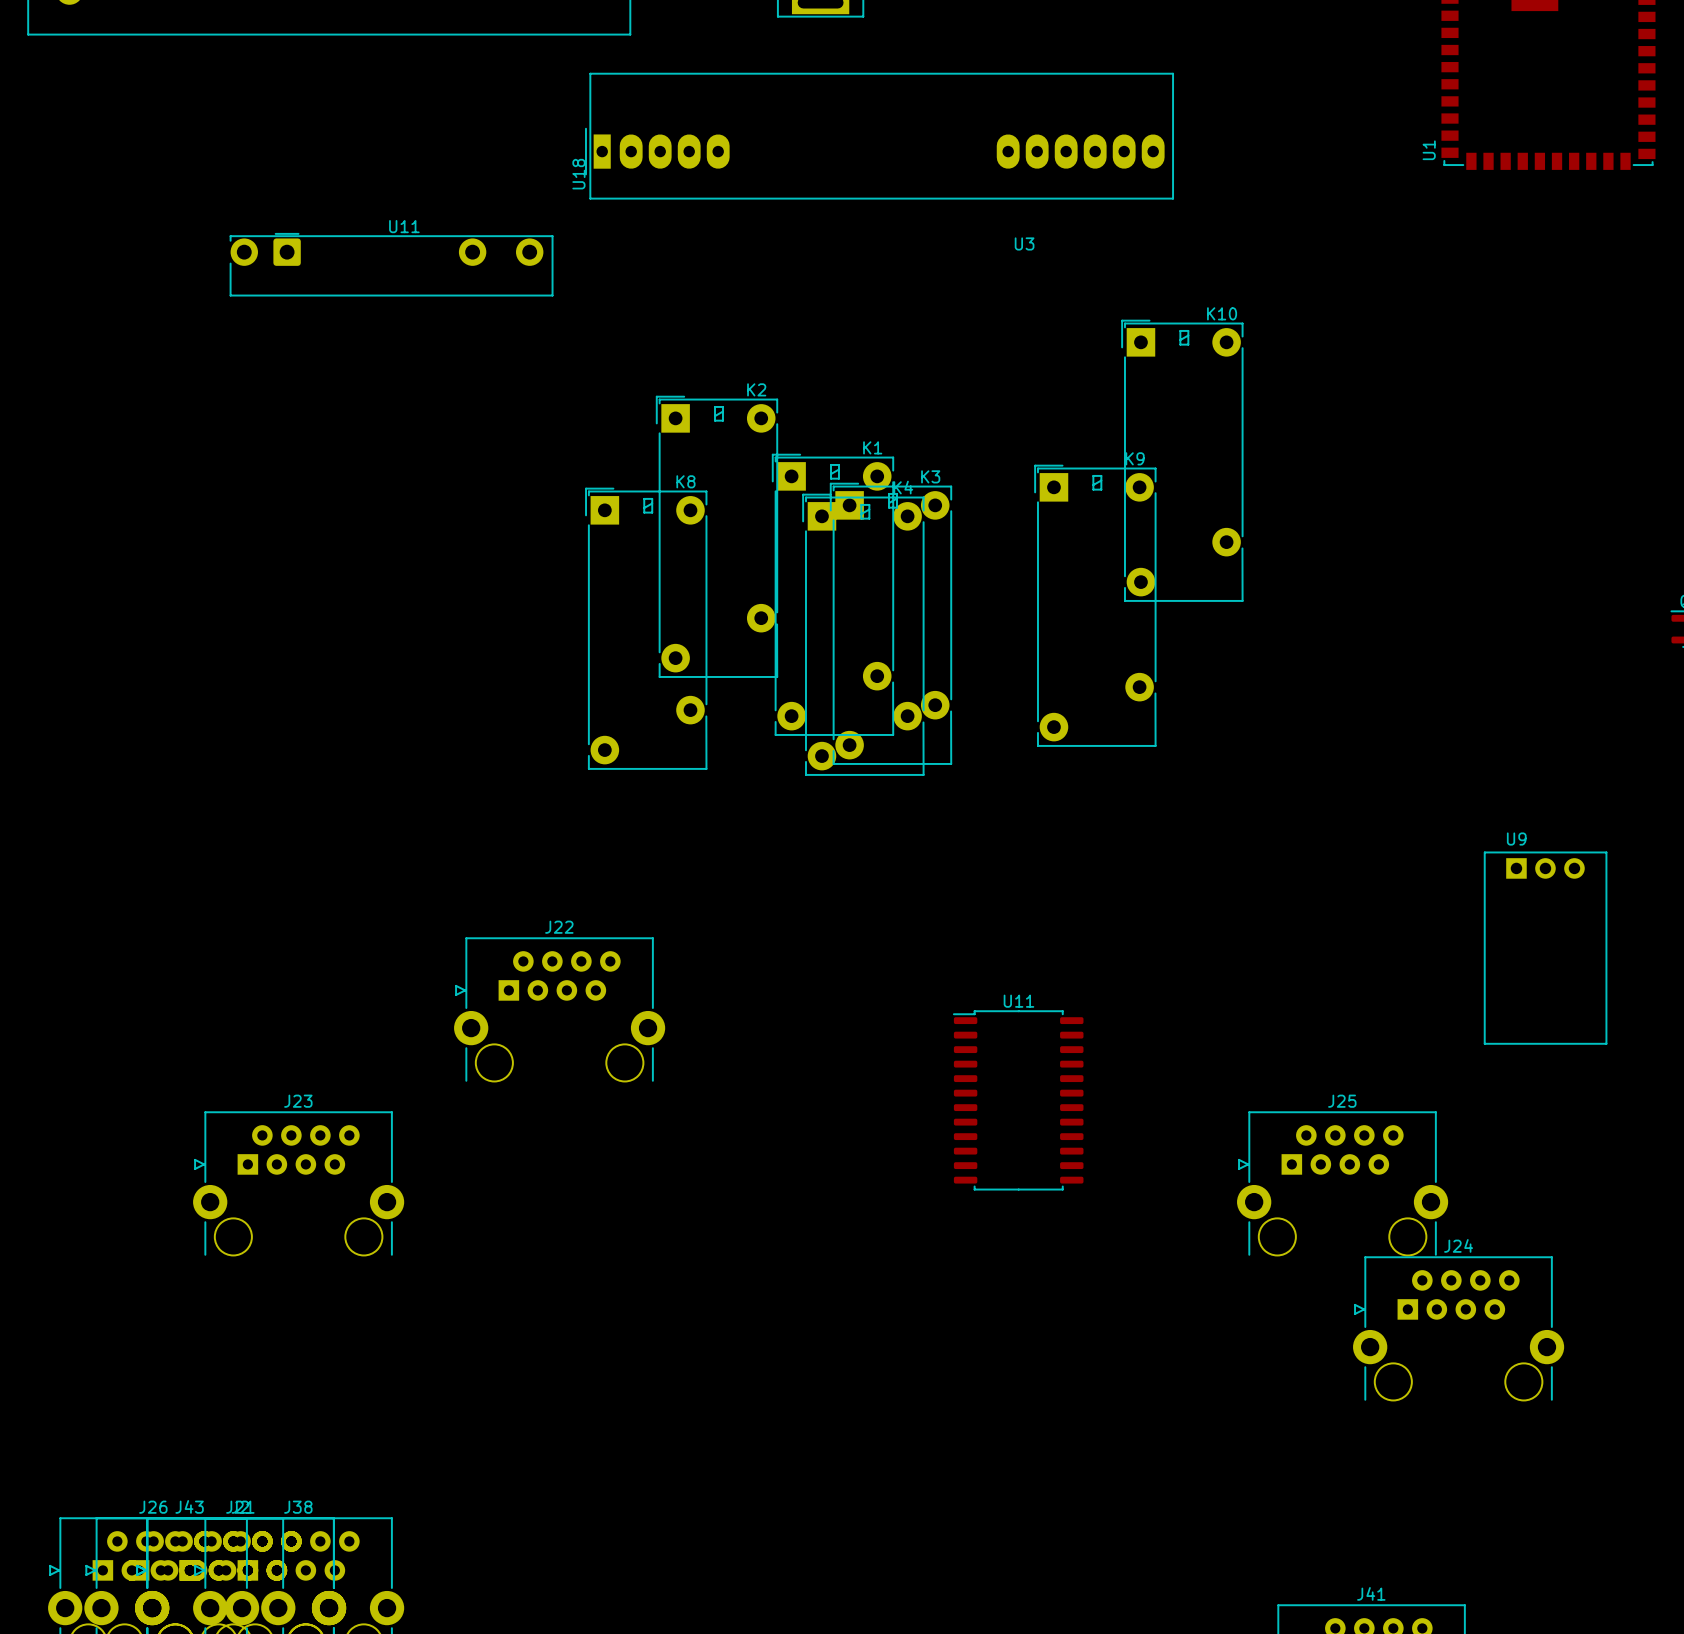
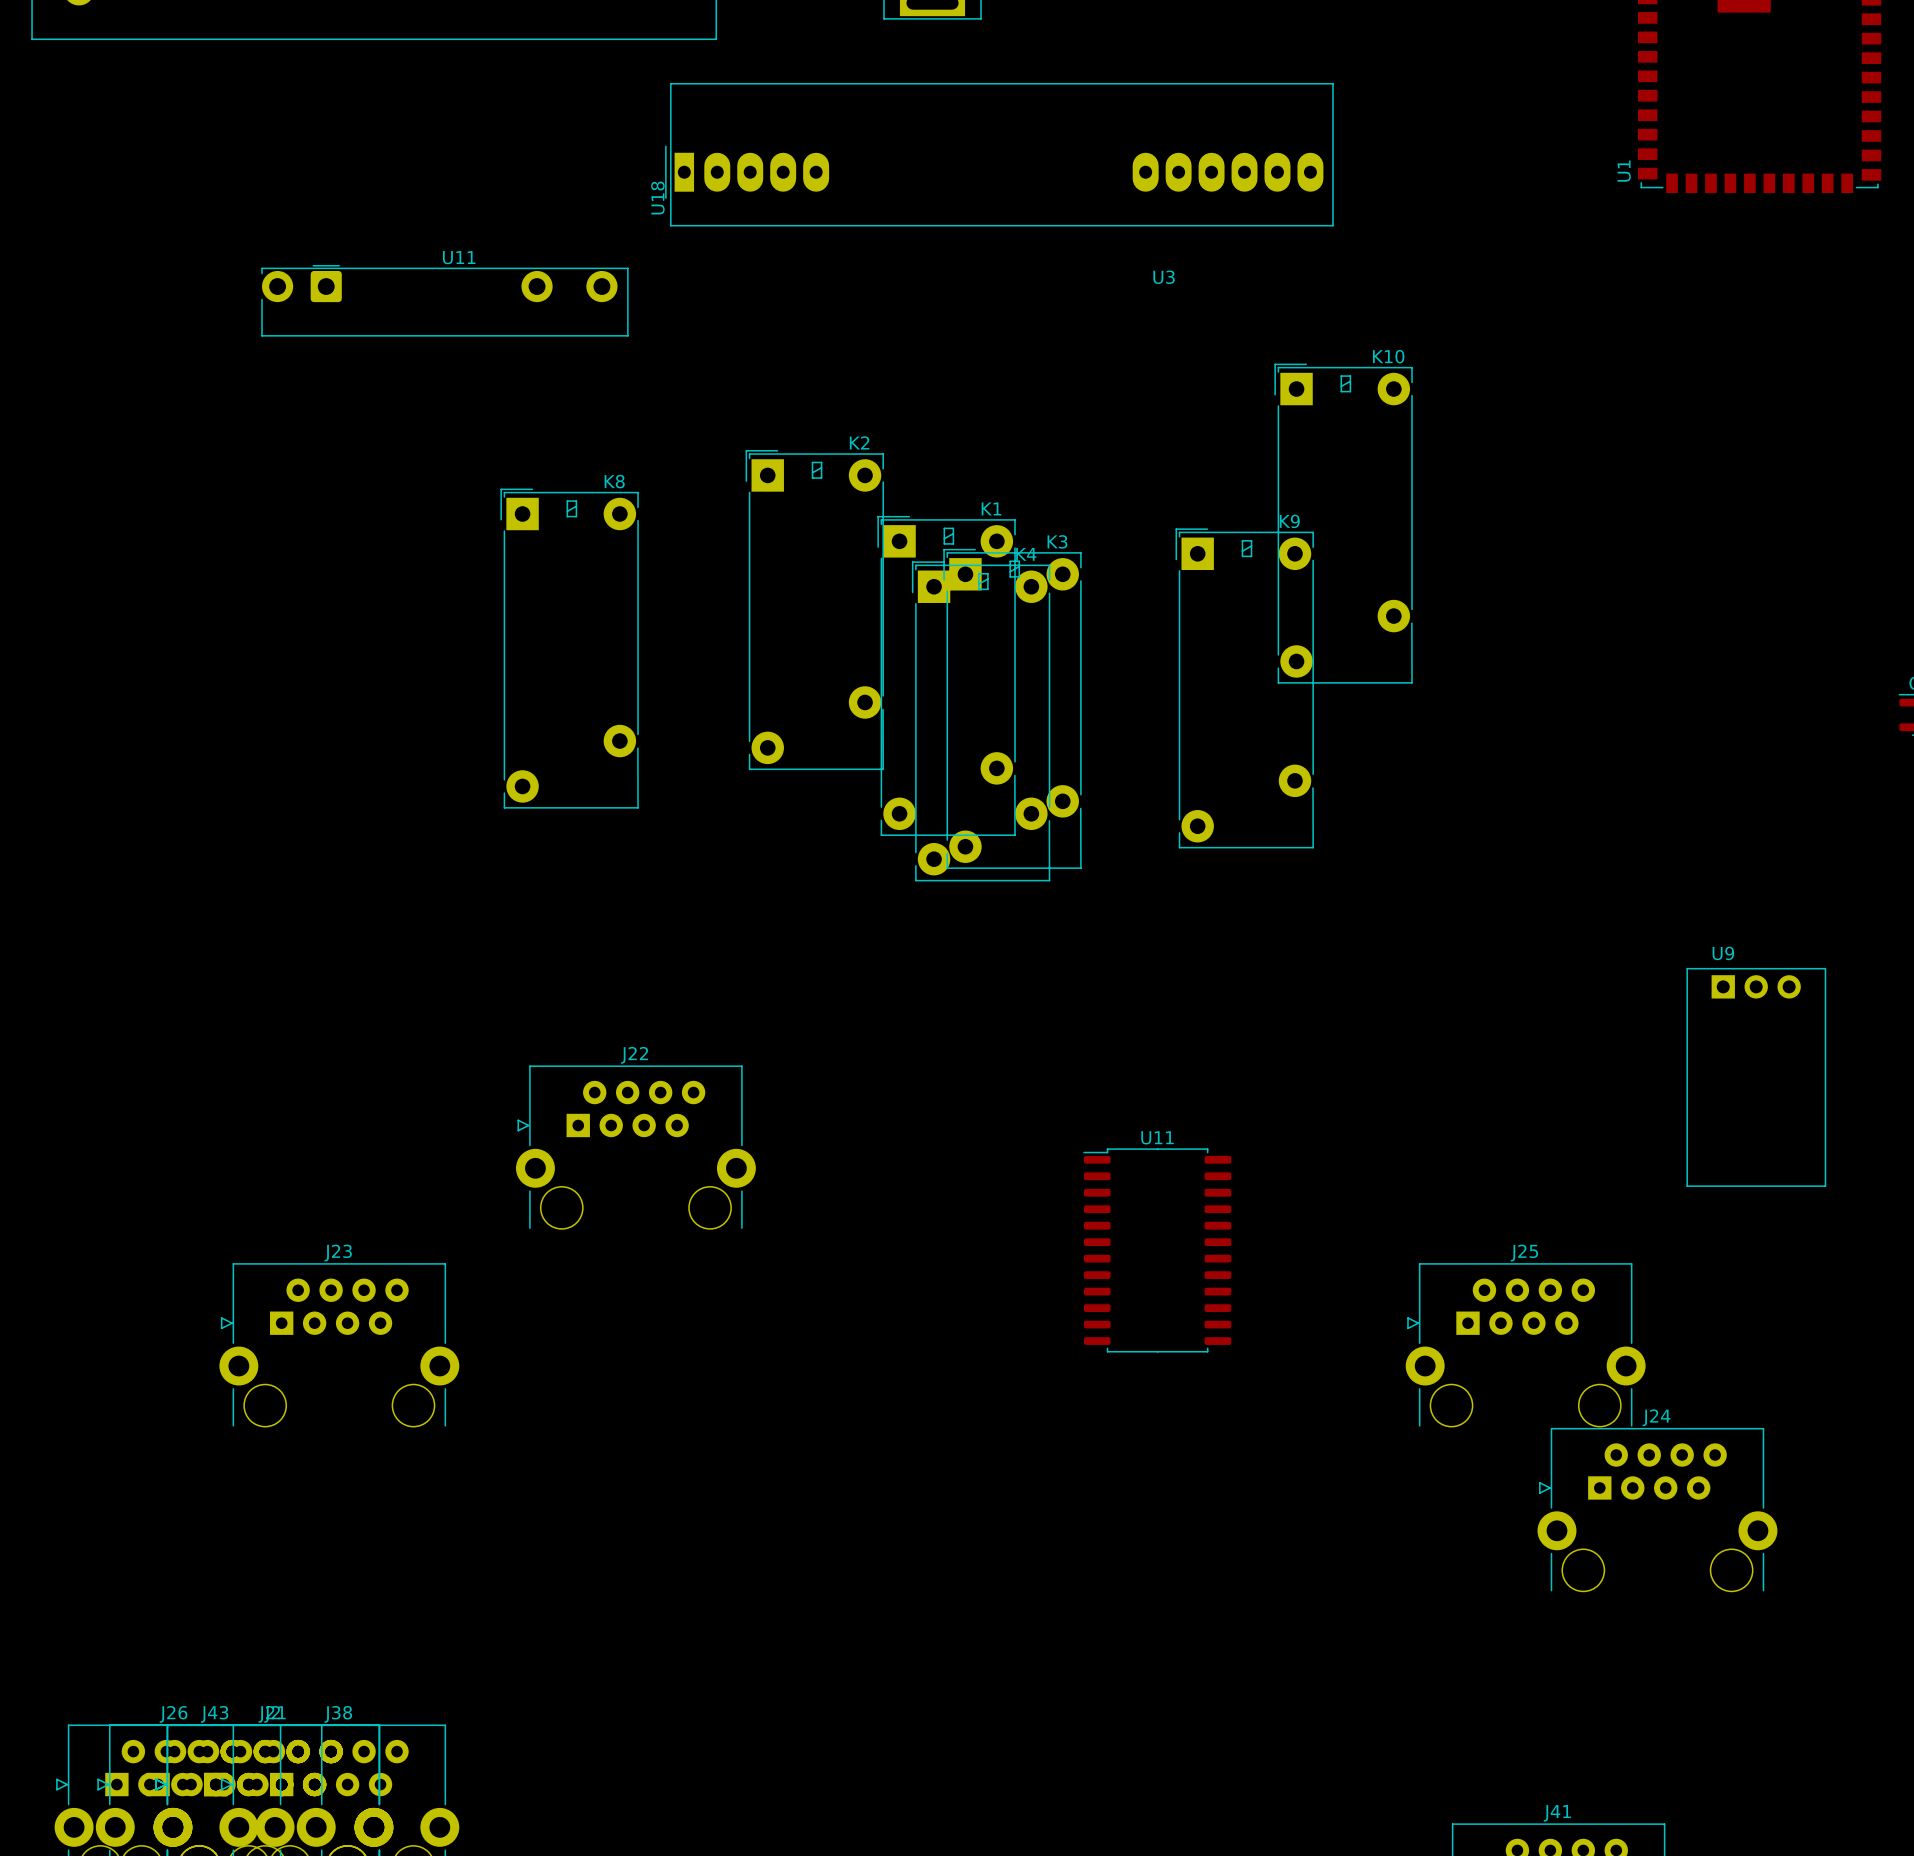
K8 position: (646, 628) -> (569, 648)

